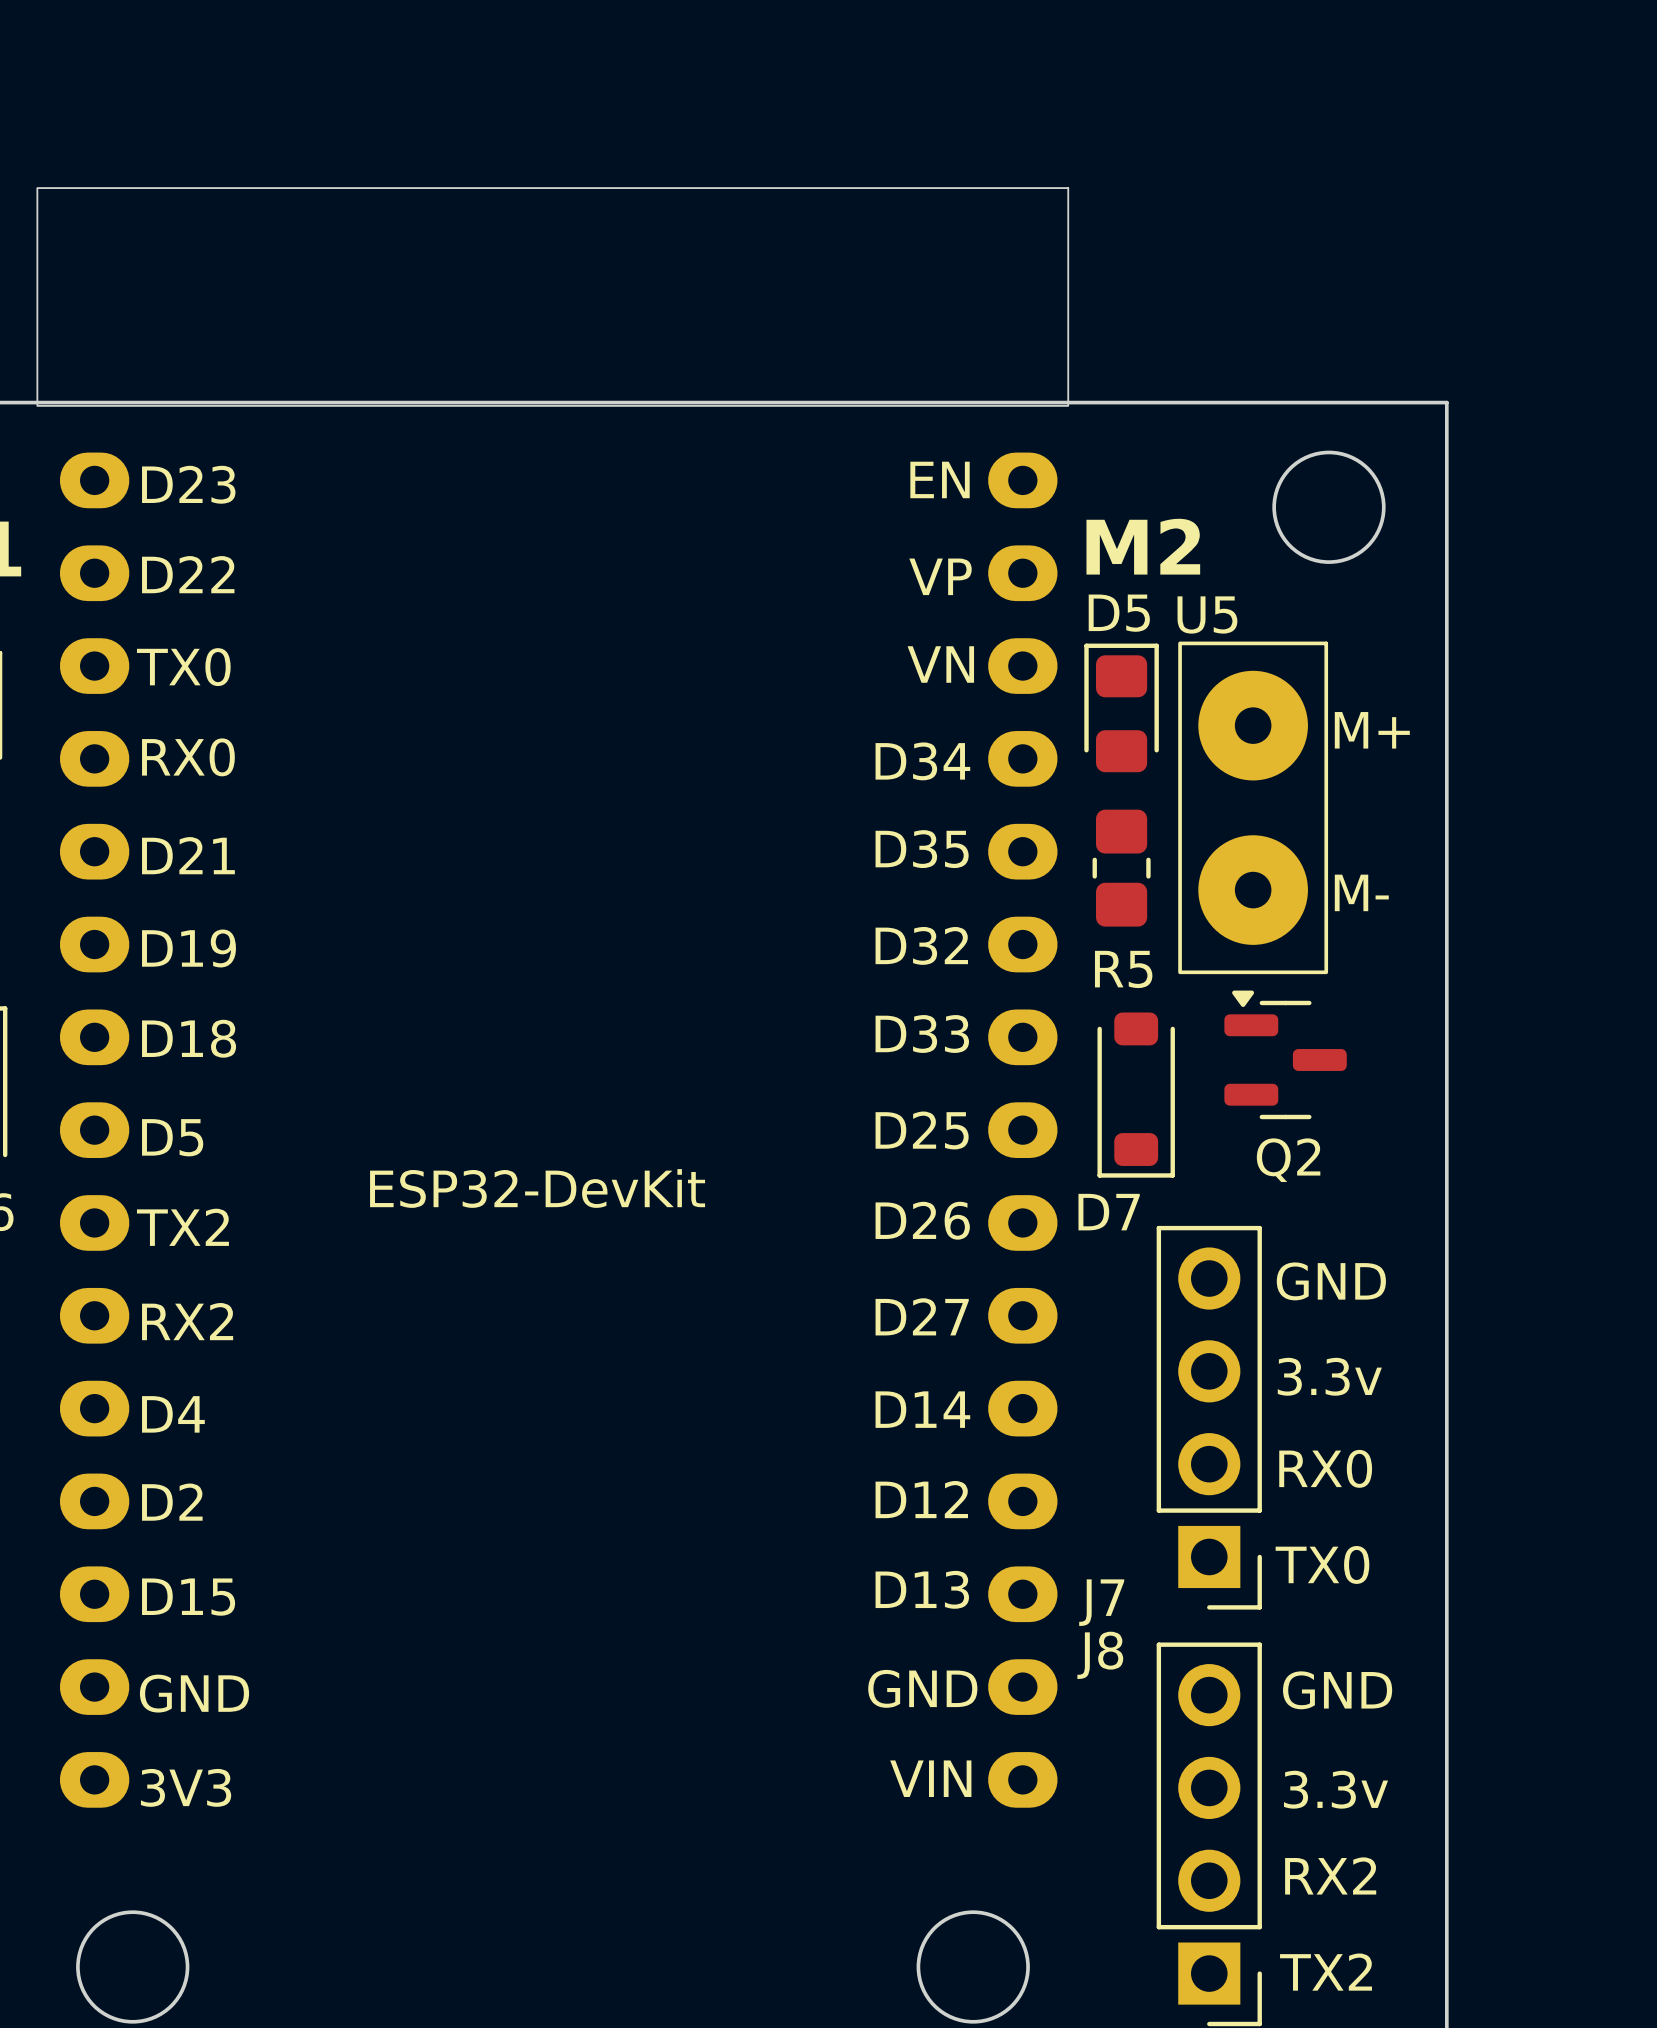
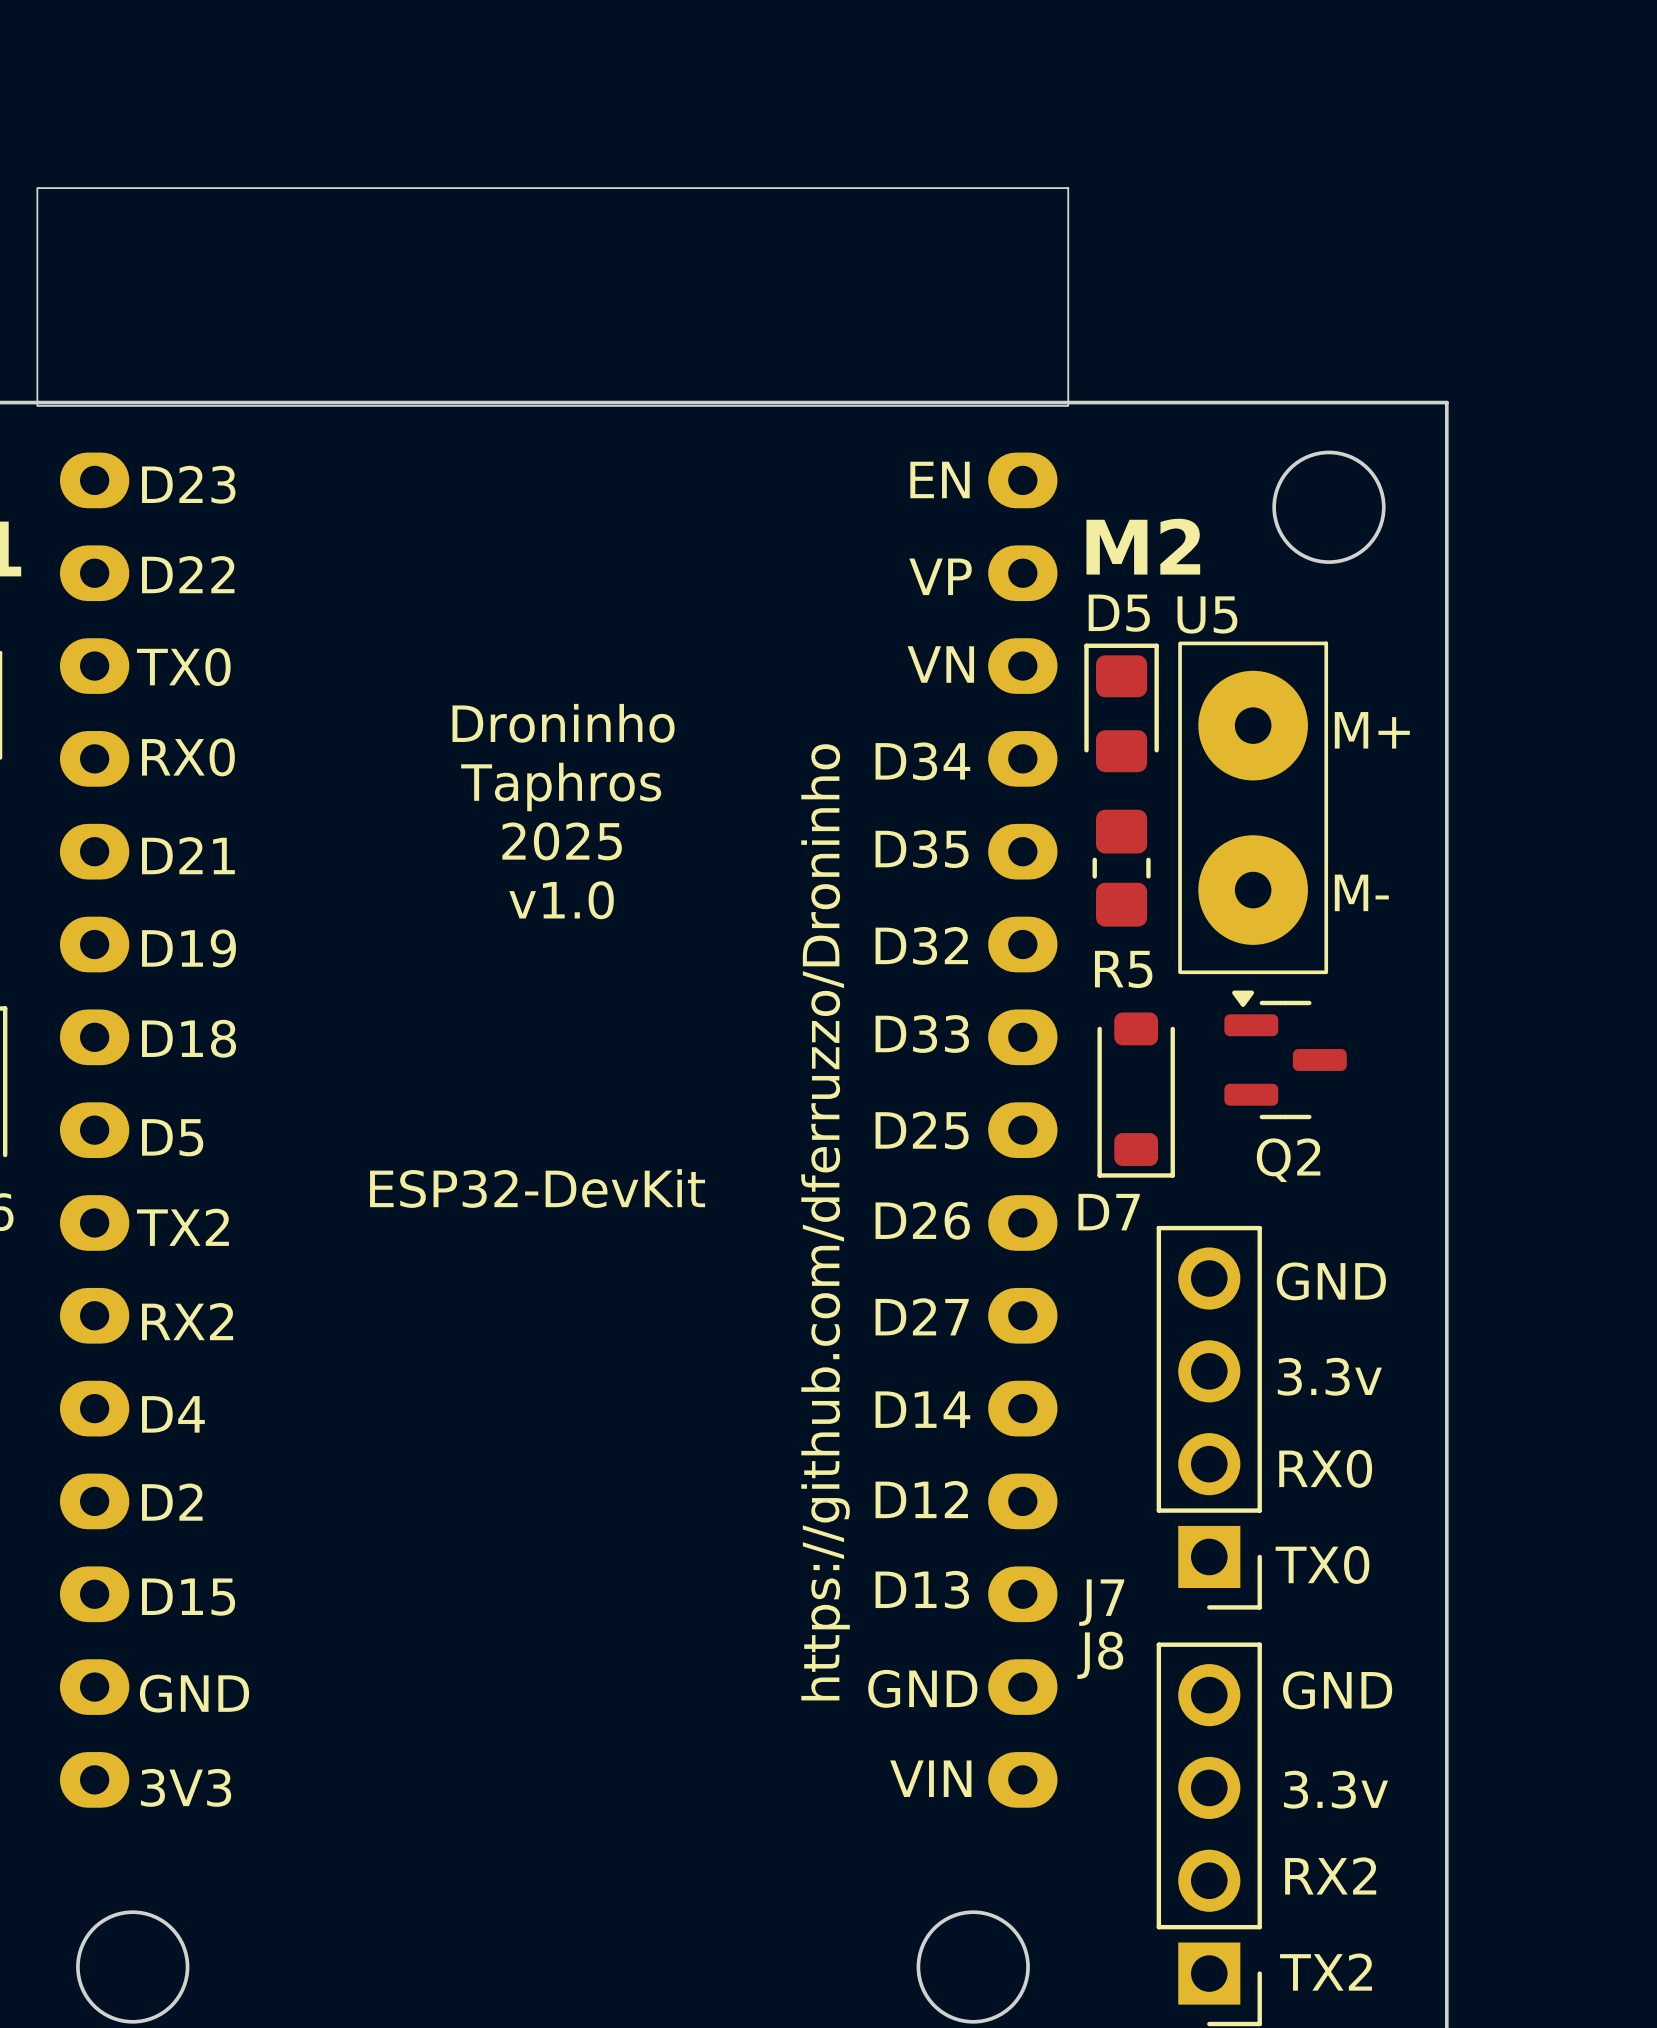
text: none -> Droninho (563, 723)
text: none -> Taphros (561, 786)
text: none -> 2025 (562, 841)
text: none -> v1.0 (561, 900)
text: none -> https://github.com/dferruzzo/Droninho (825, 1222)

